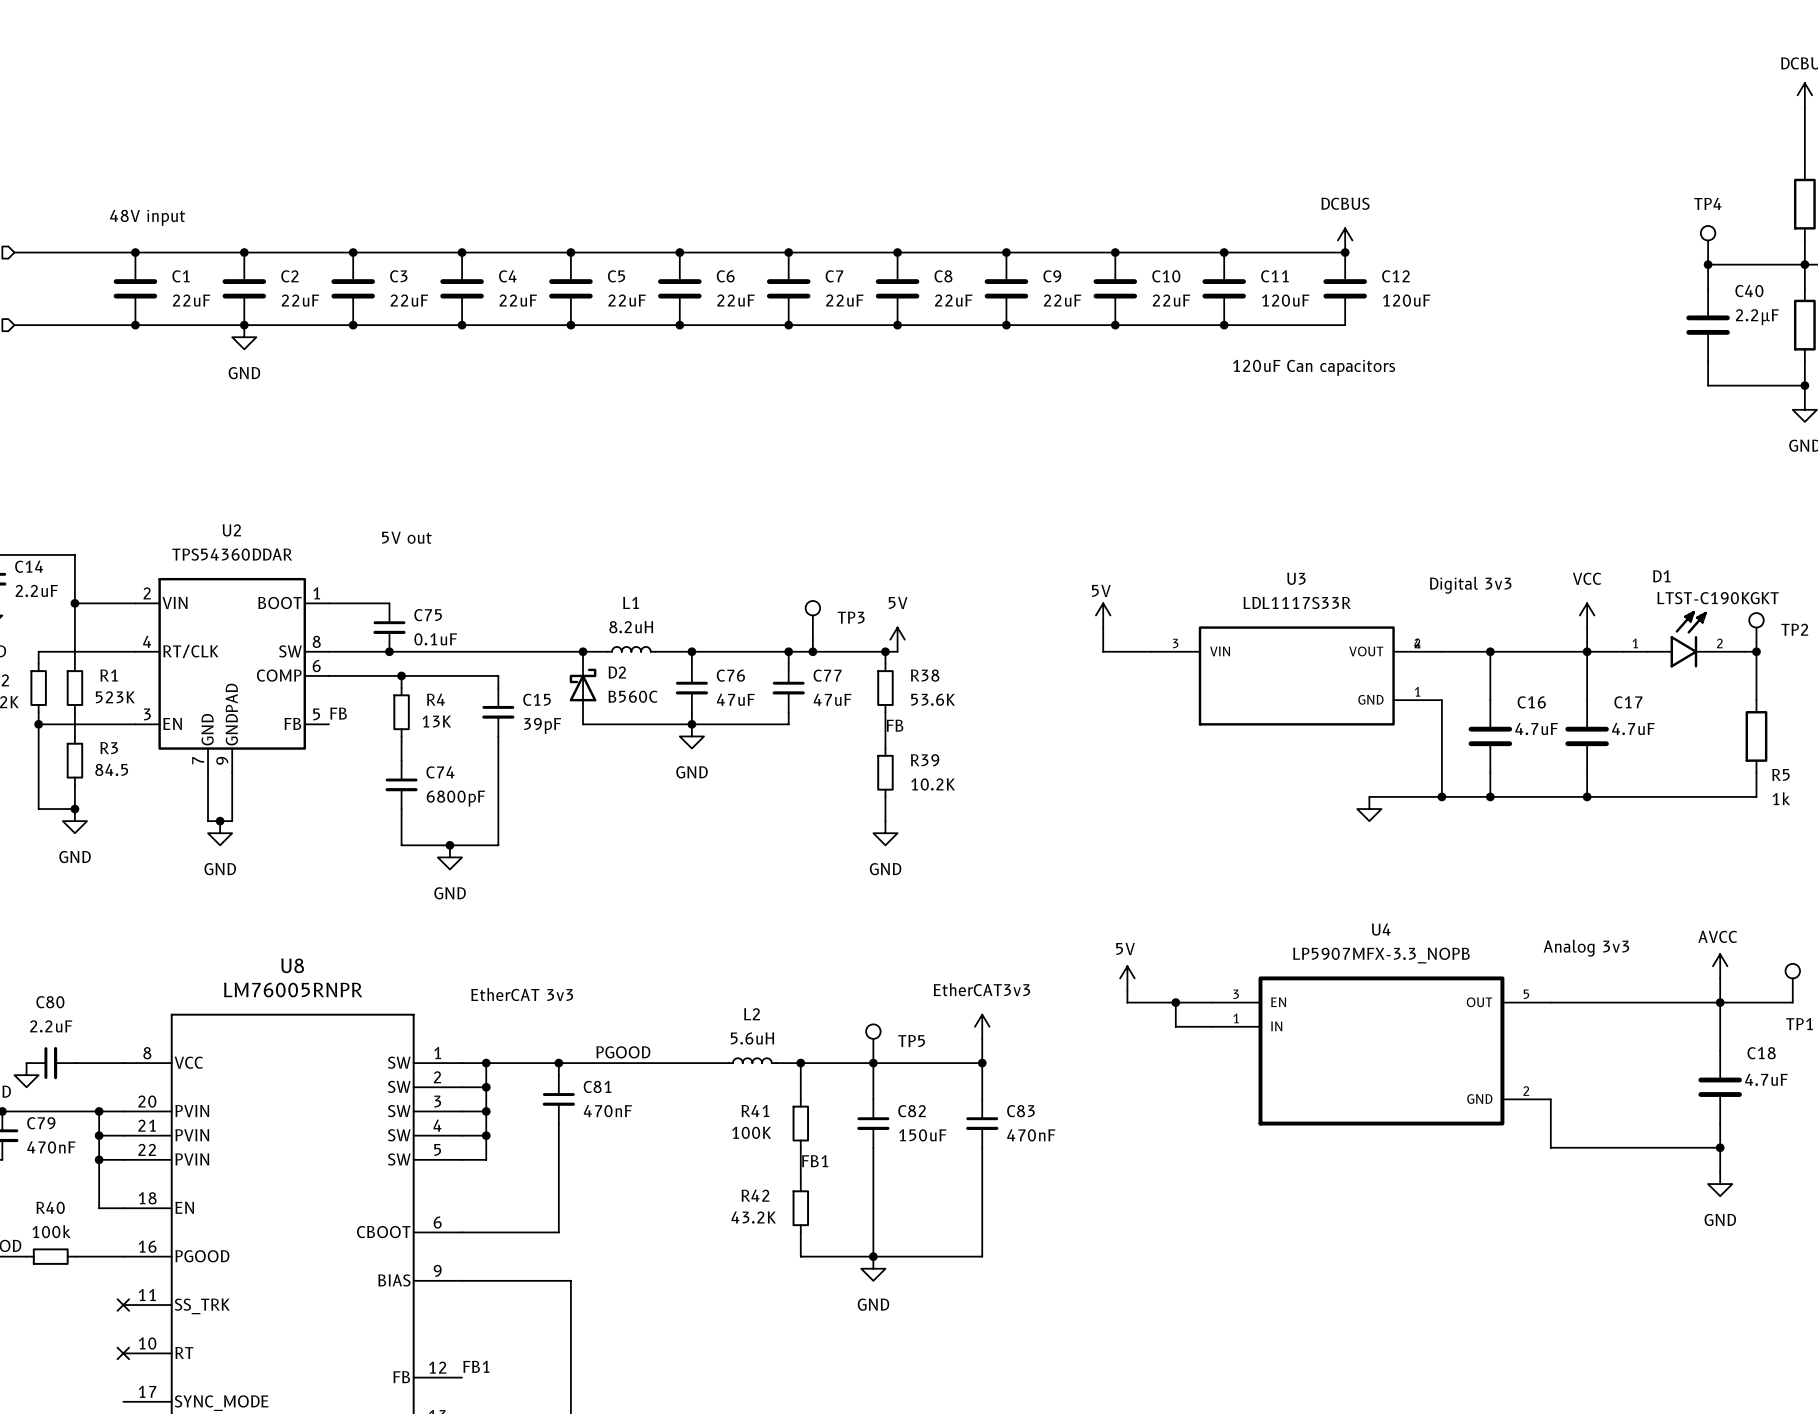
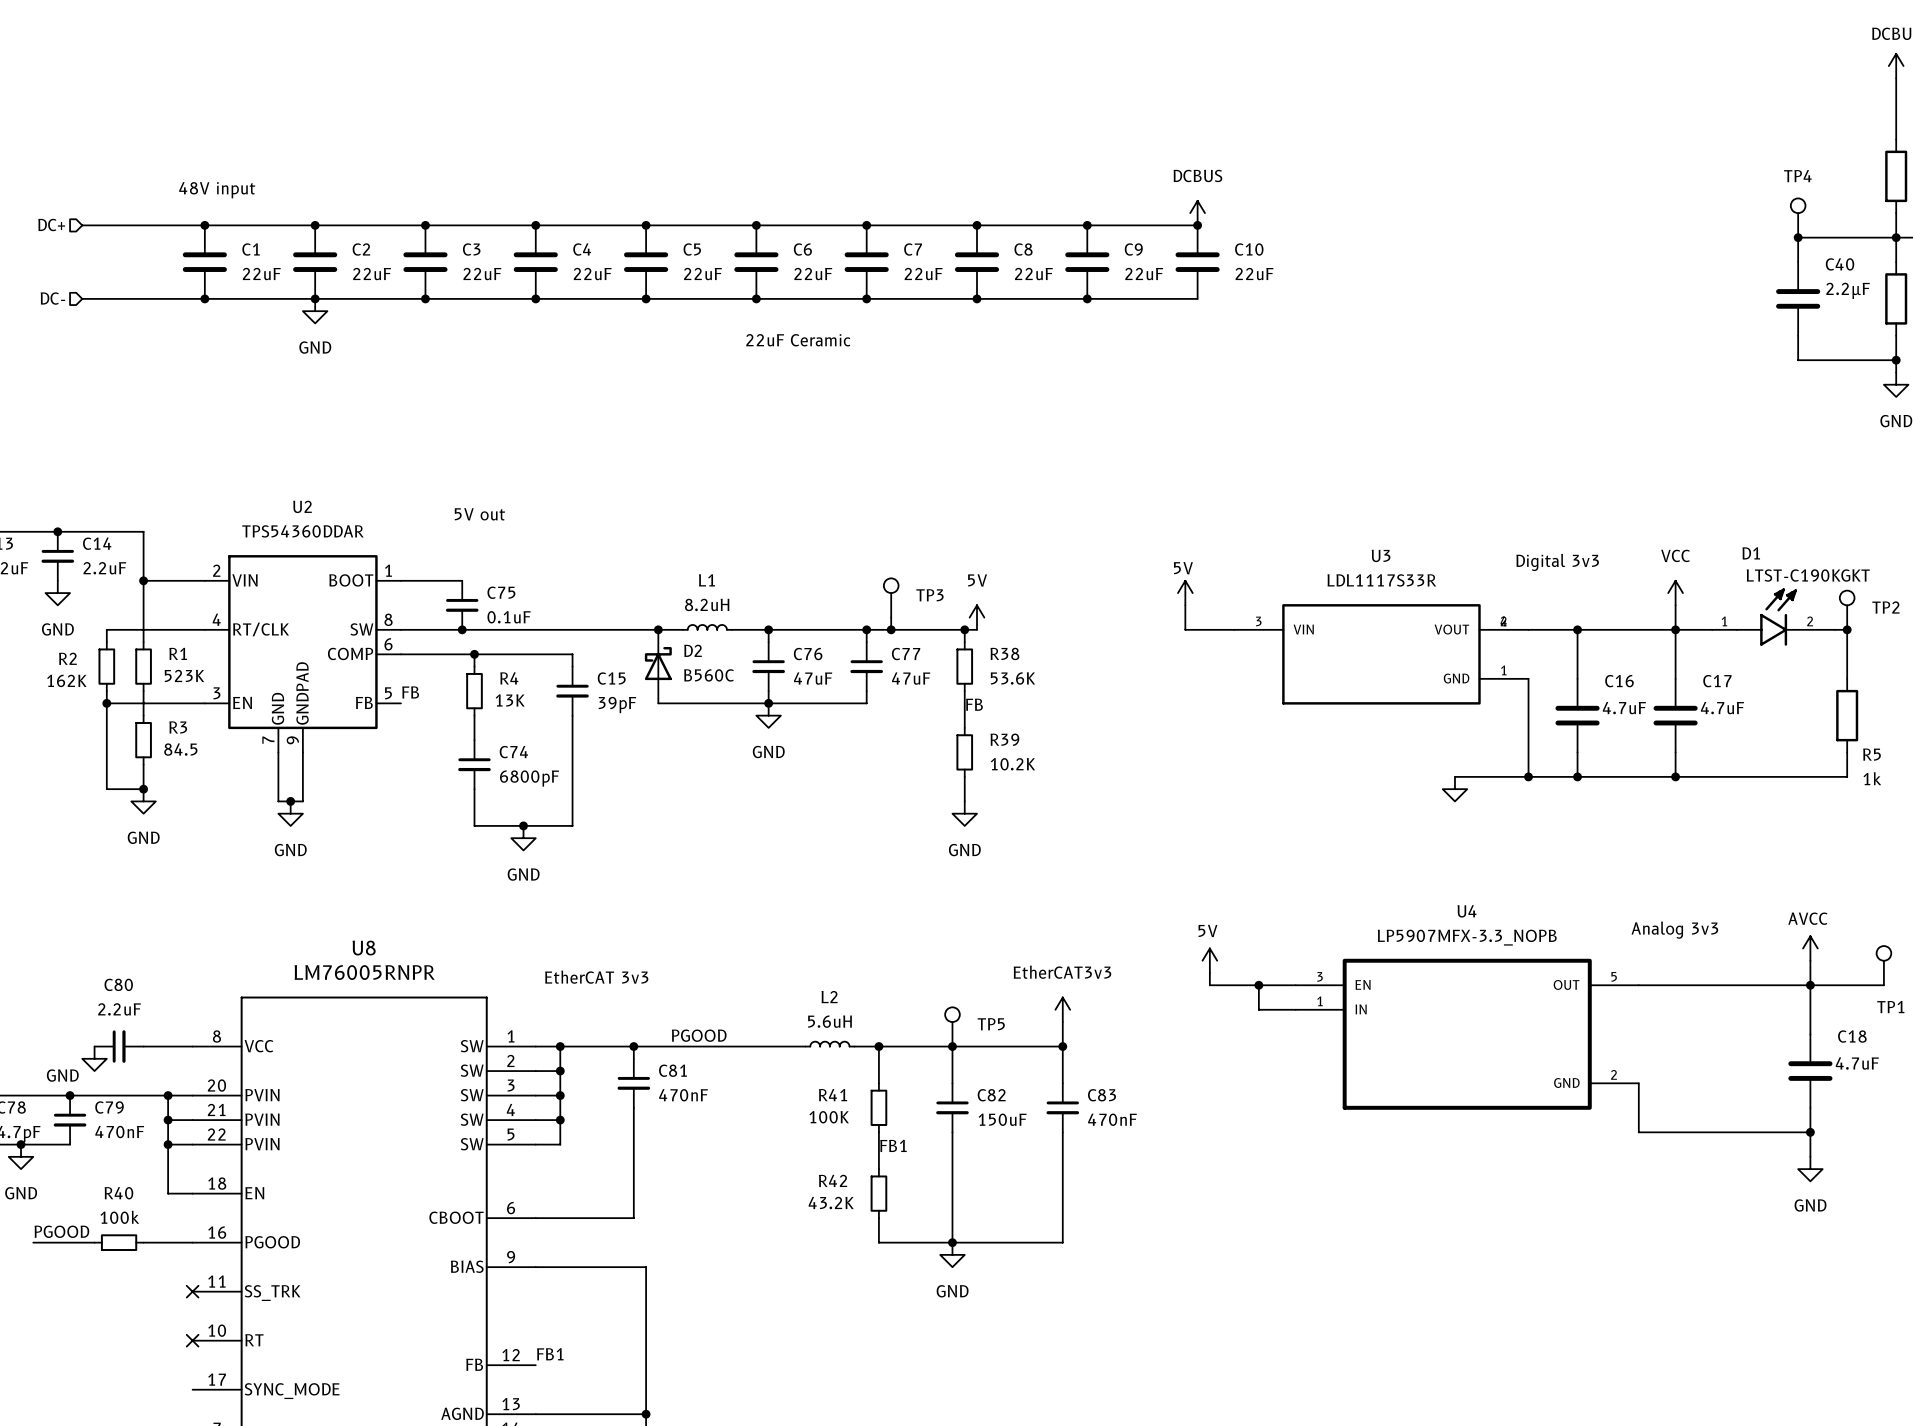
power symbol position: DCBUS (1345, 240) -> DCBUS (1197, 213)
wire: (1115, 252) (1345, 252) -> none
junction: (1224, 252) -> none
junction: (1345, 252) -> none
C11: 120uF (1224, 288) -> none
C12: 120uF (1345, 288) -> none
wire: (1115, 325) (1345, 325) -> none
junction: (1115, 325) -> none
junction: (1224, 325) -> none
text: none -> 22uF Ceramic (798, 340)
text: 120uF Can capacitors (1314, 367) -> none

